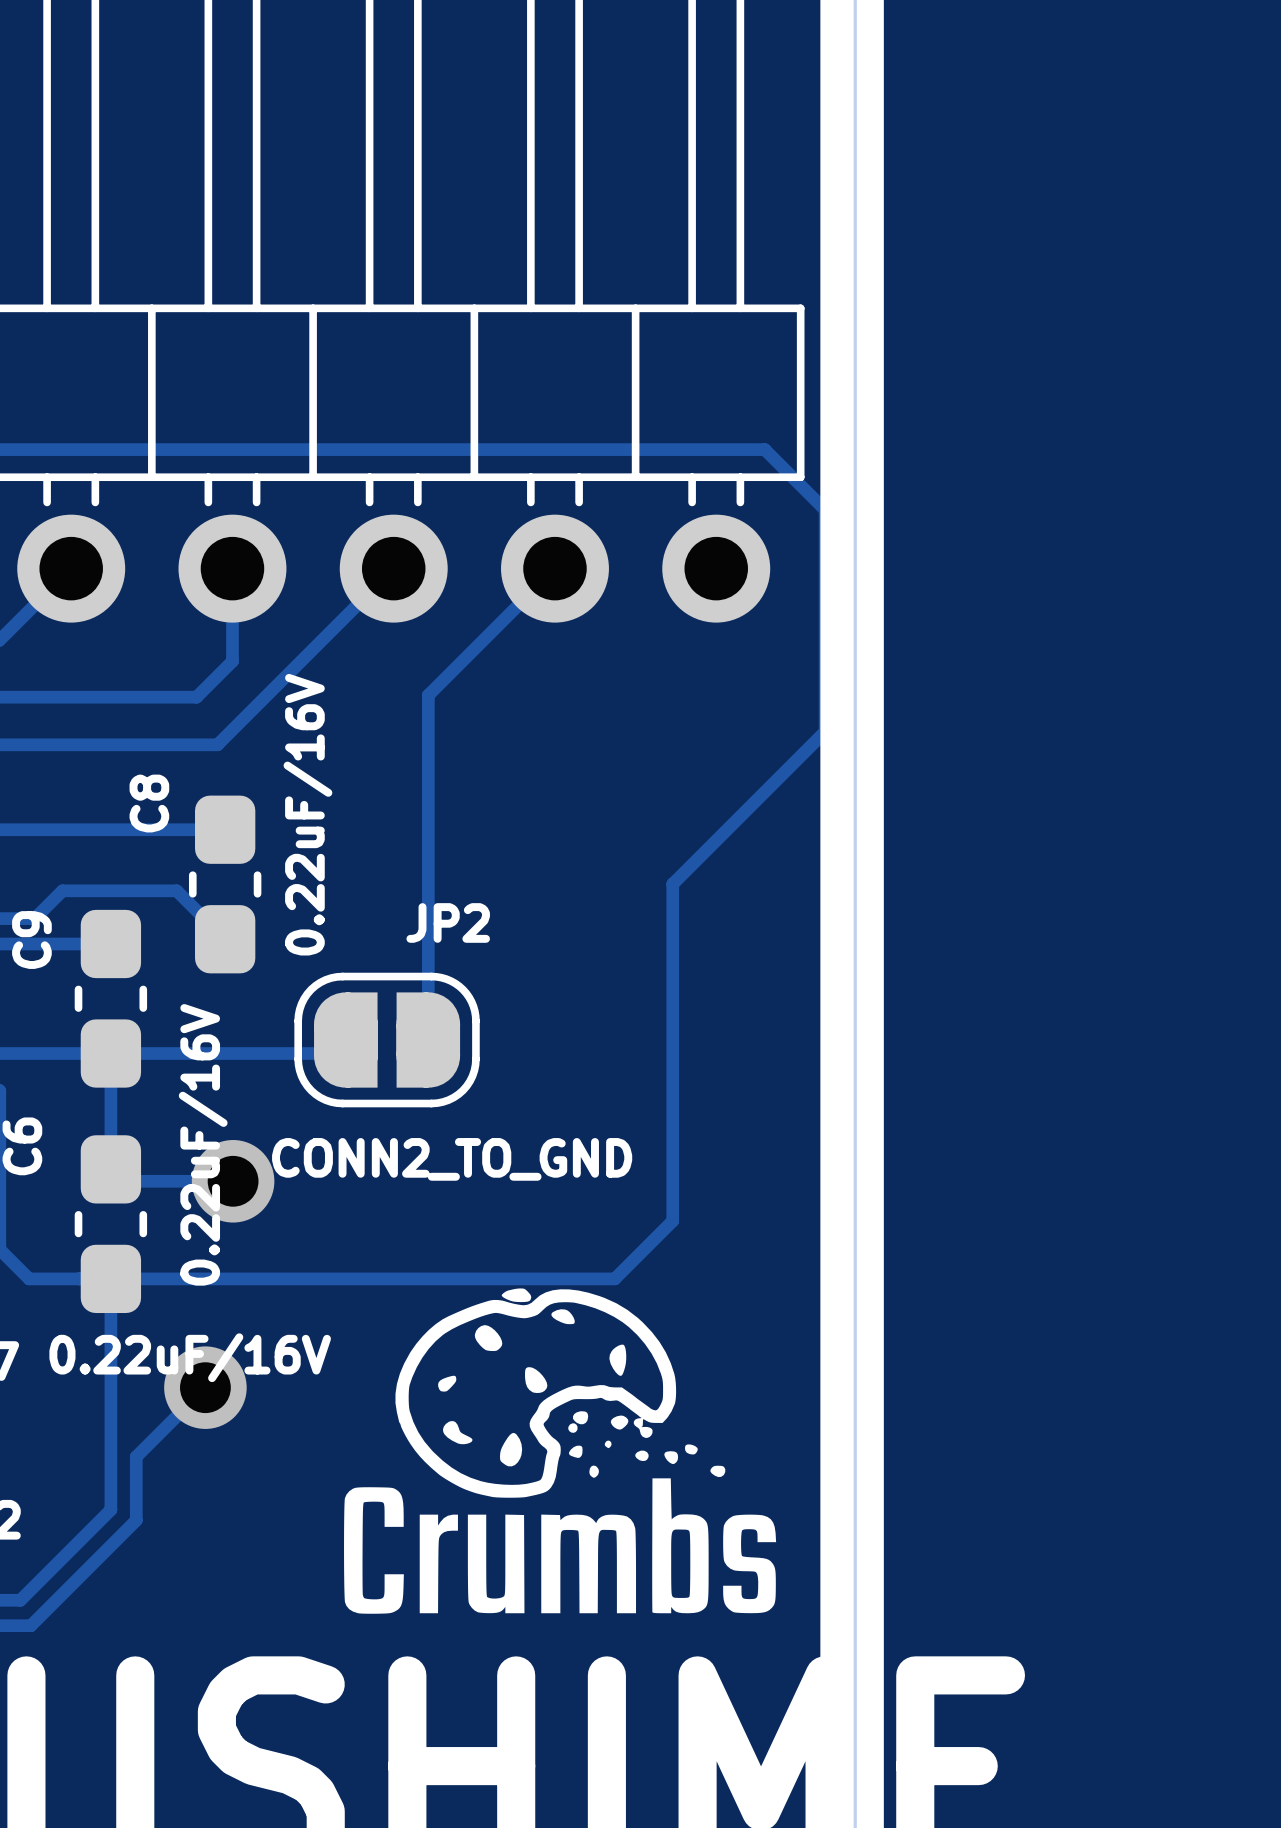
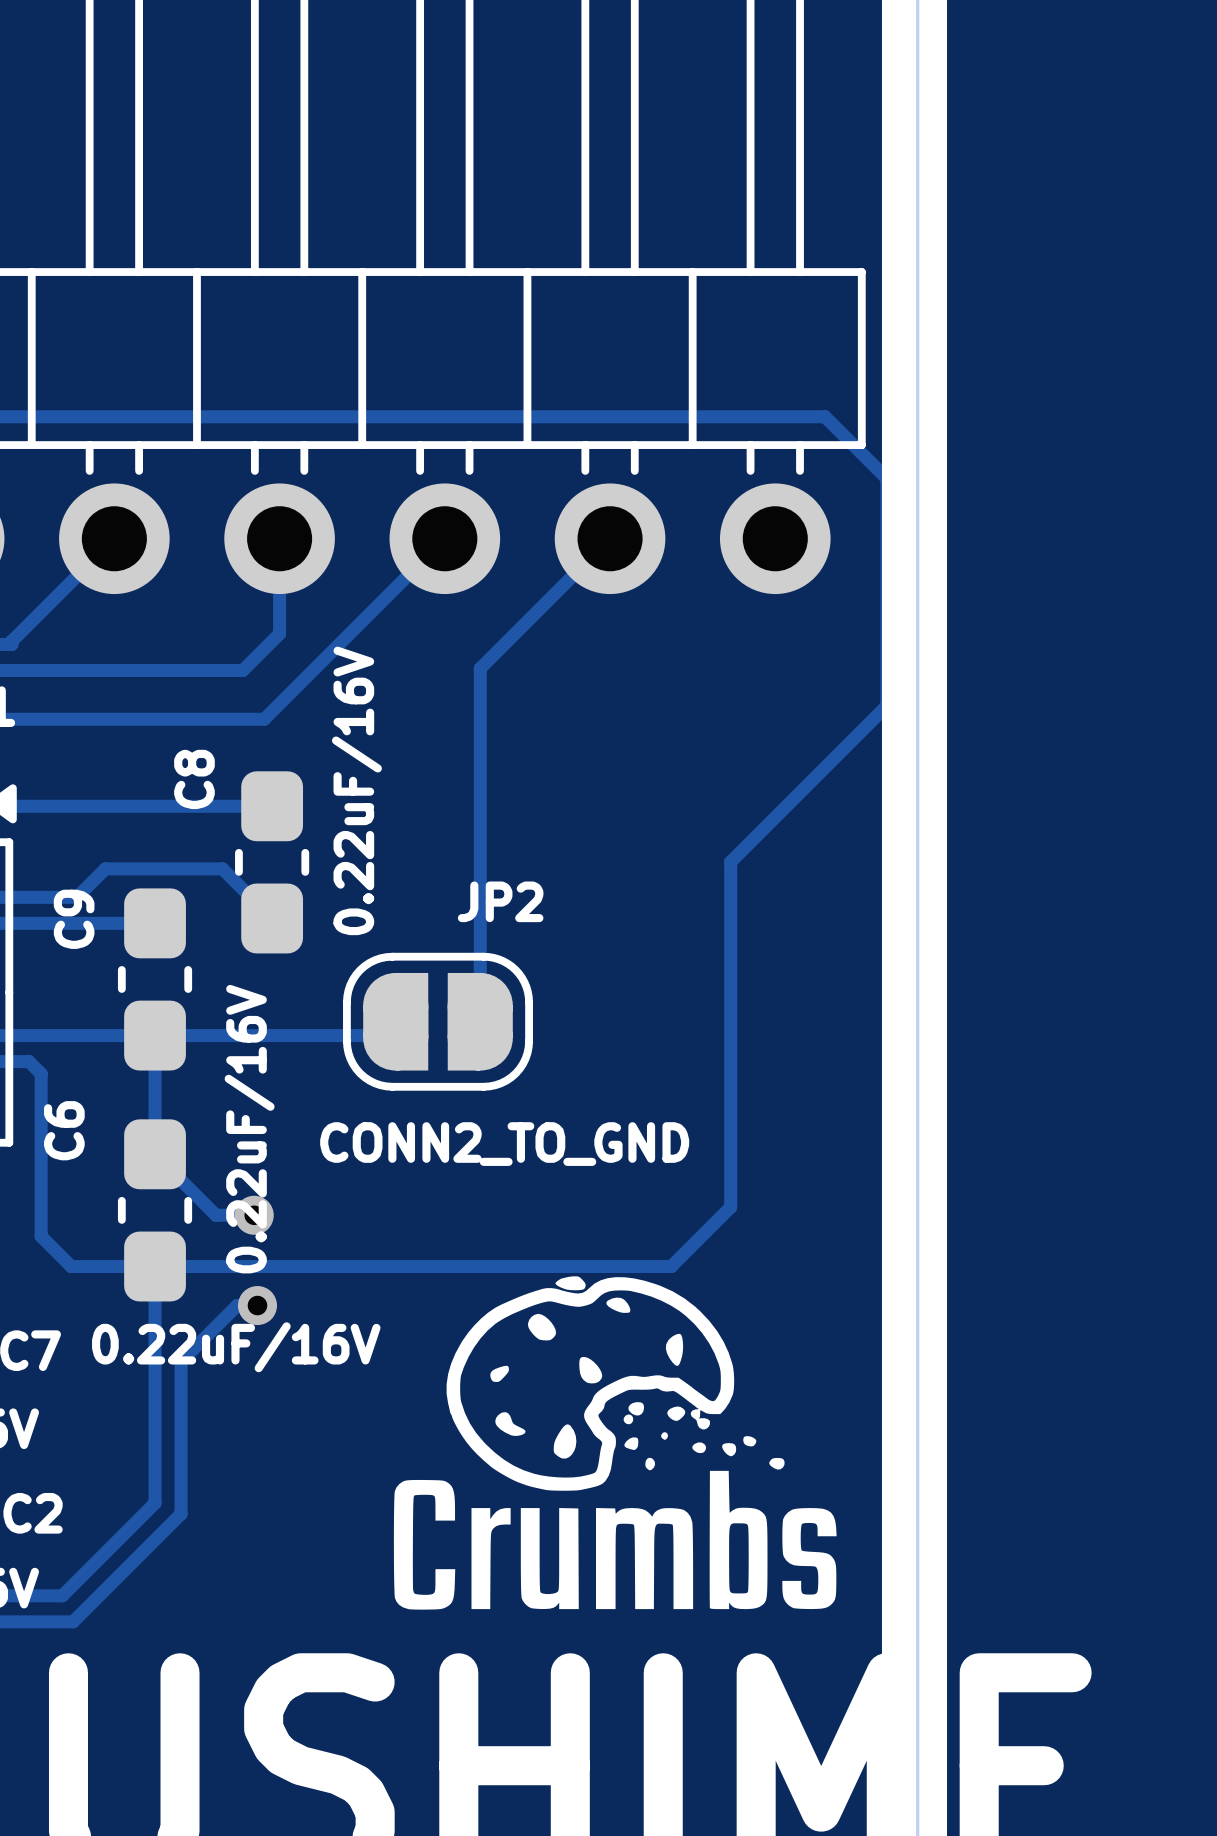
via size: [191, 1140, 275, 1223] -> [234, 1195, 274, 1235]
track: (122, 1181) (233, 1181) -> (167, 1166) (216, 1215) (254, 1215)
via: none -> (257, 1305)
track: (205, 1387) (136, 1456) -> (257, 1305) (237, 1305) (181, 1361) (181, 1448)
via: (205, 1387) -> none

